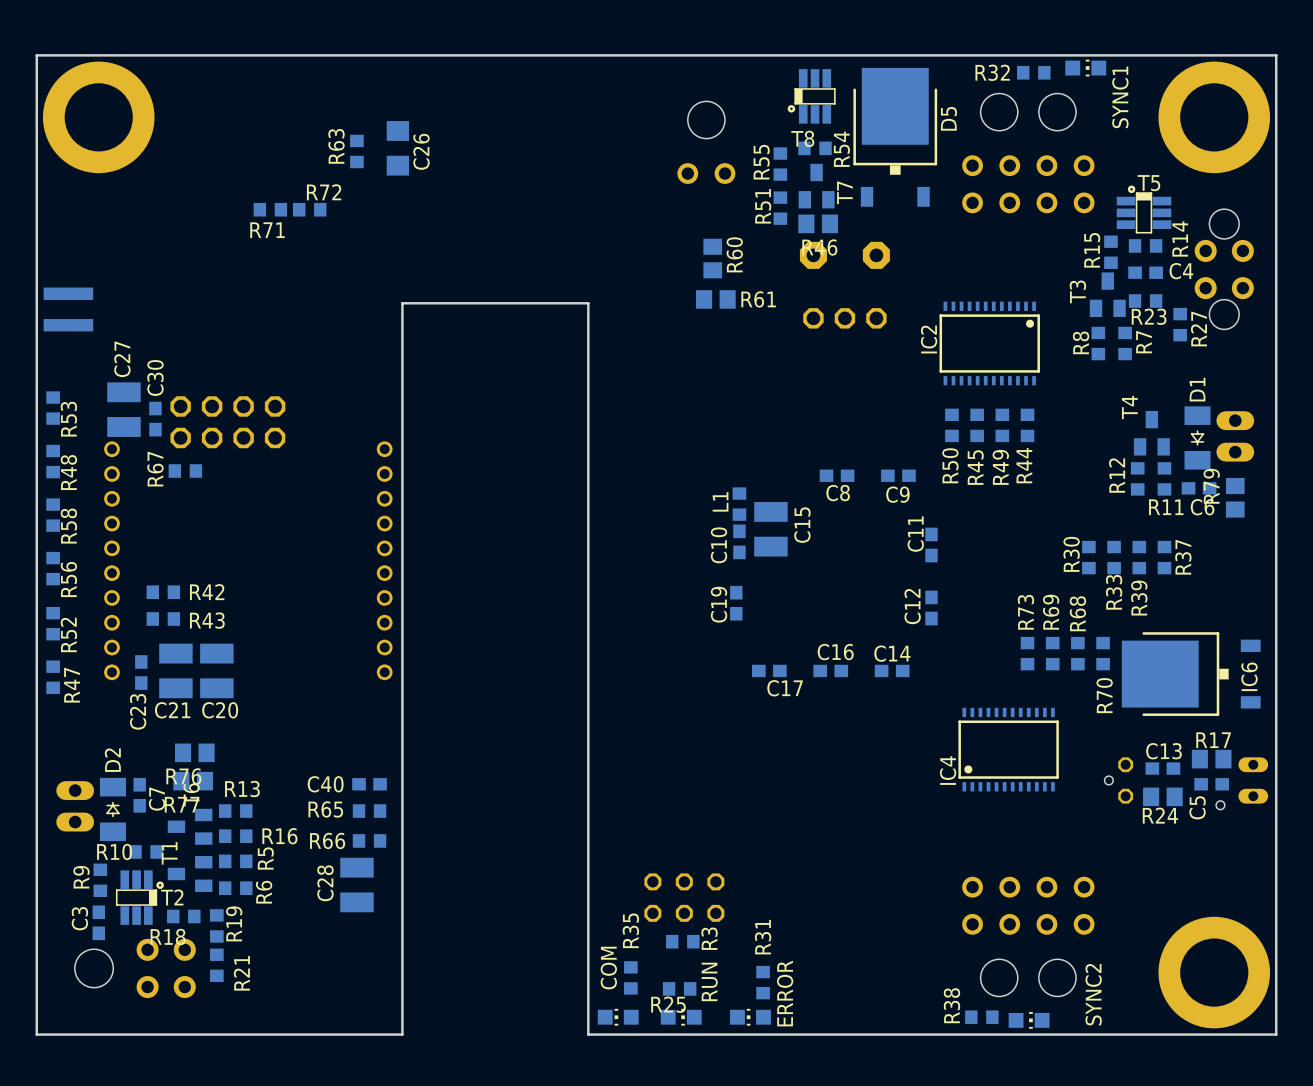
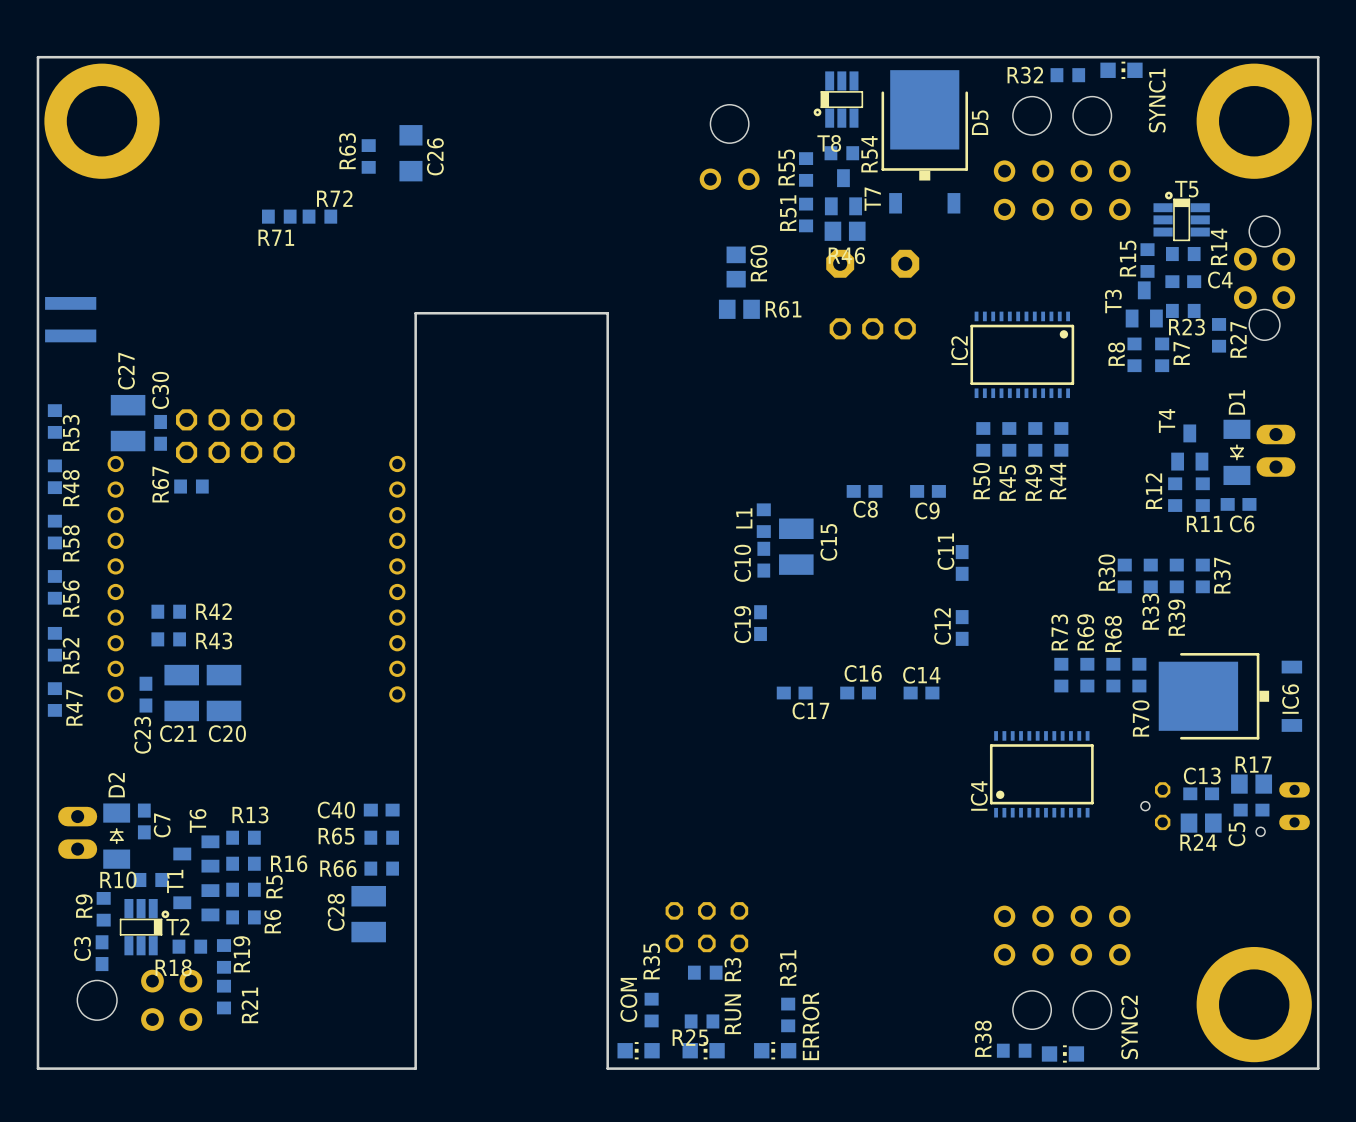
R79: (1235, 497) -> none
R76: (194, 752) -> none
R77: (193, 781) -> none

